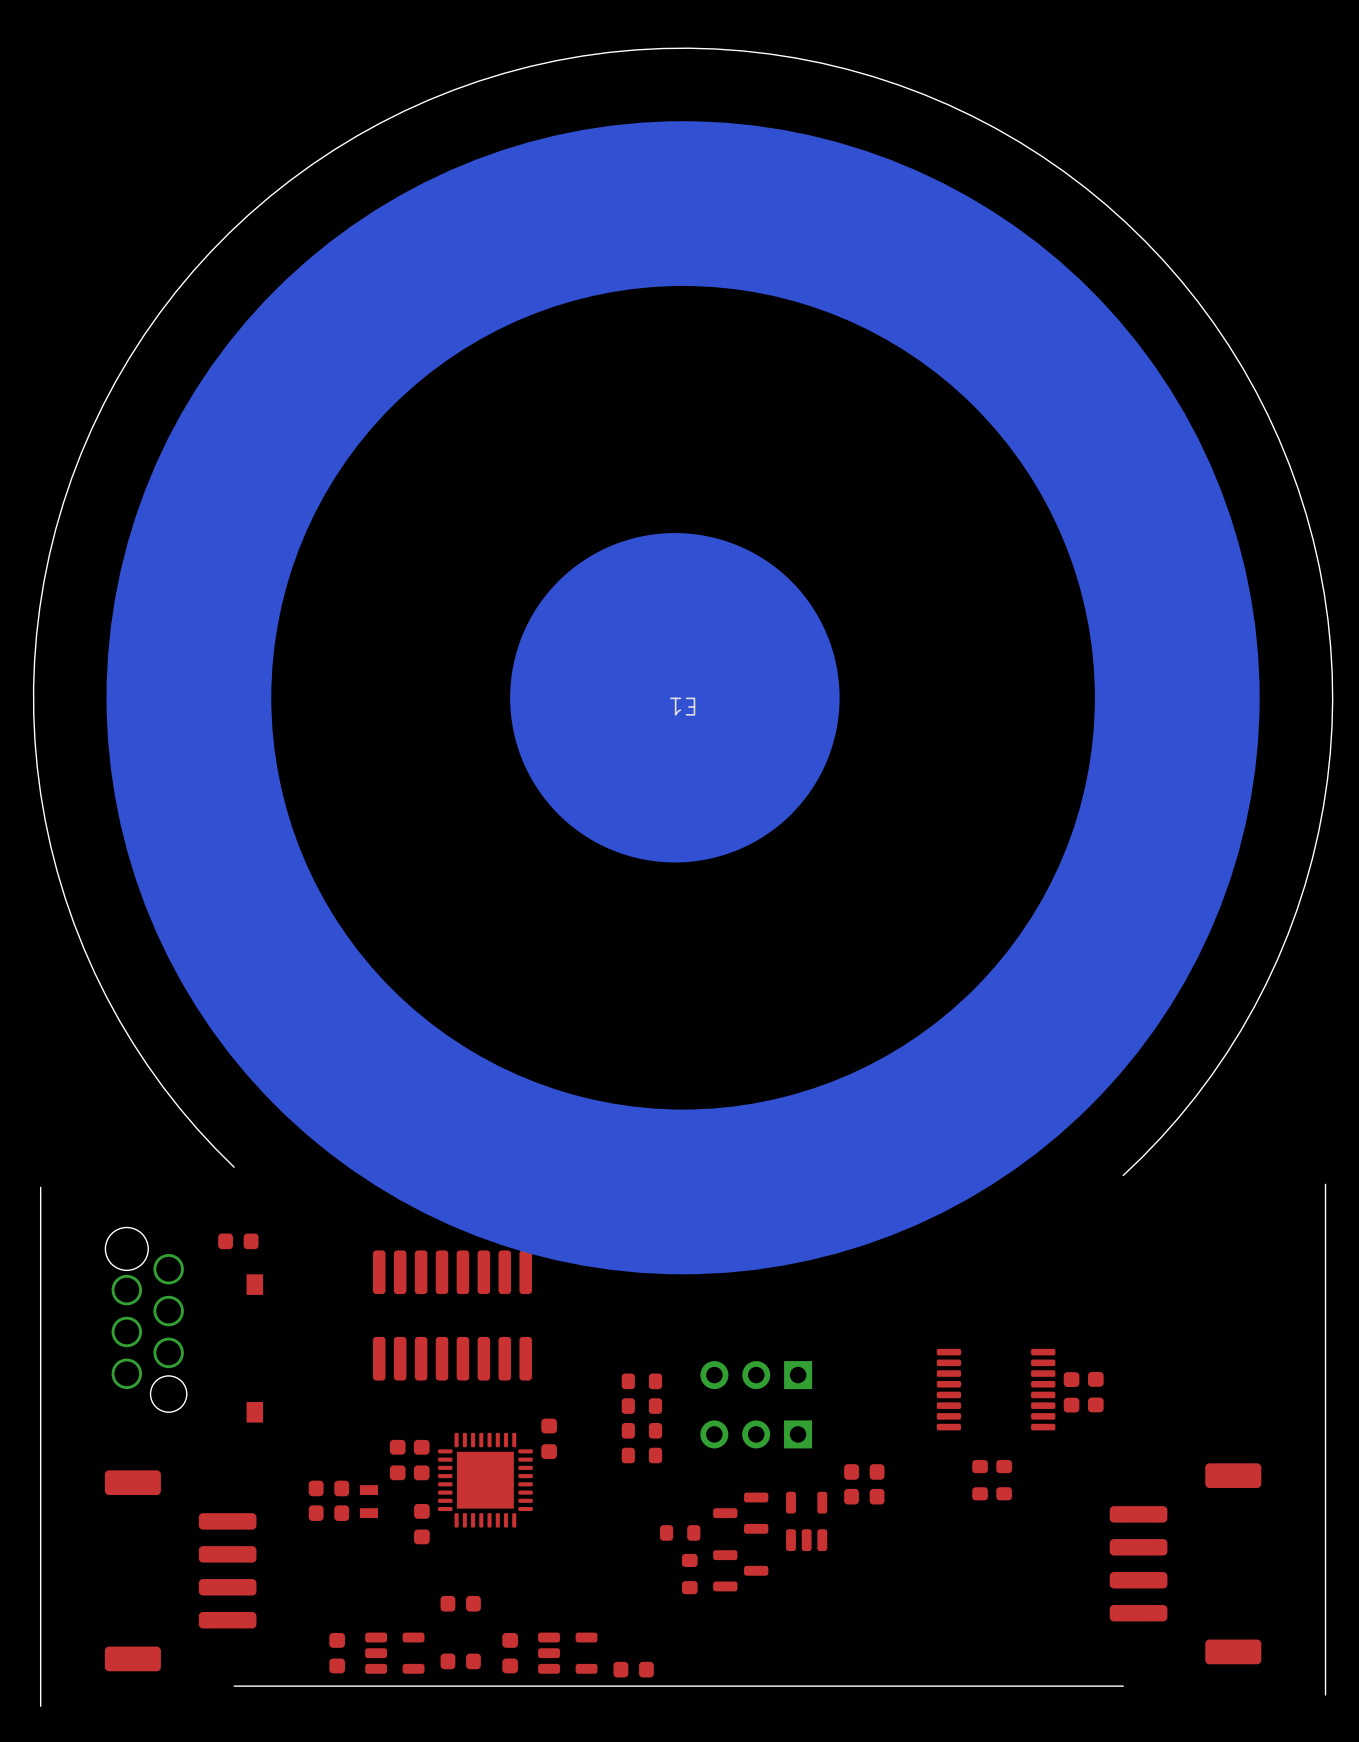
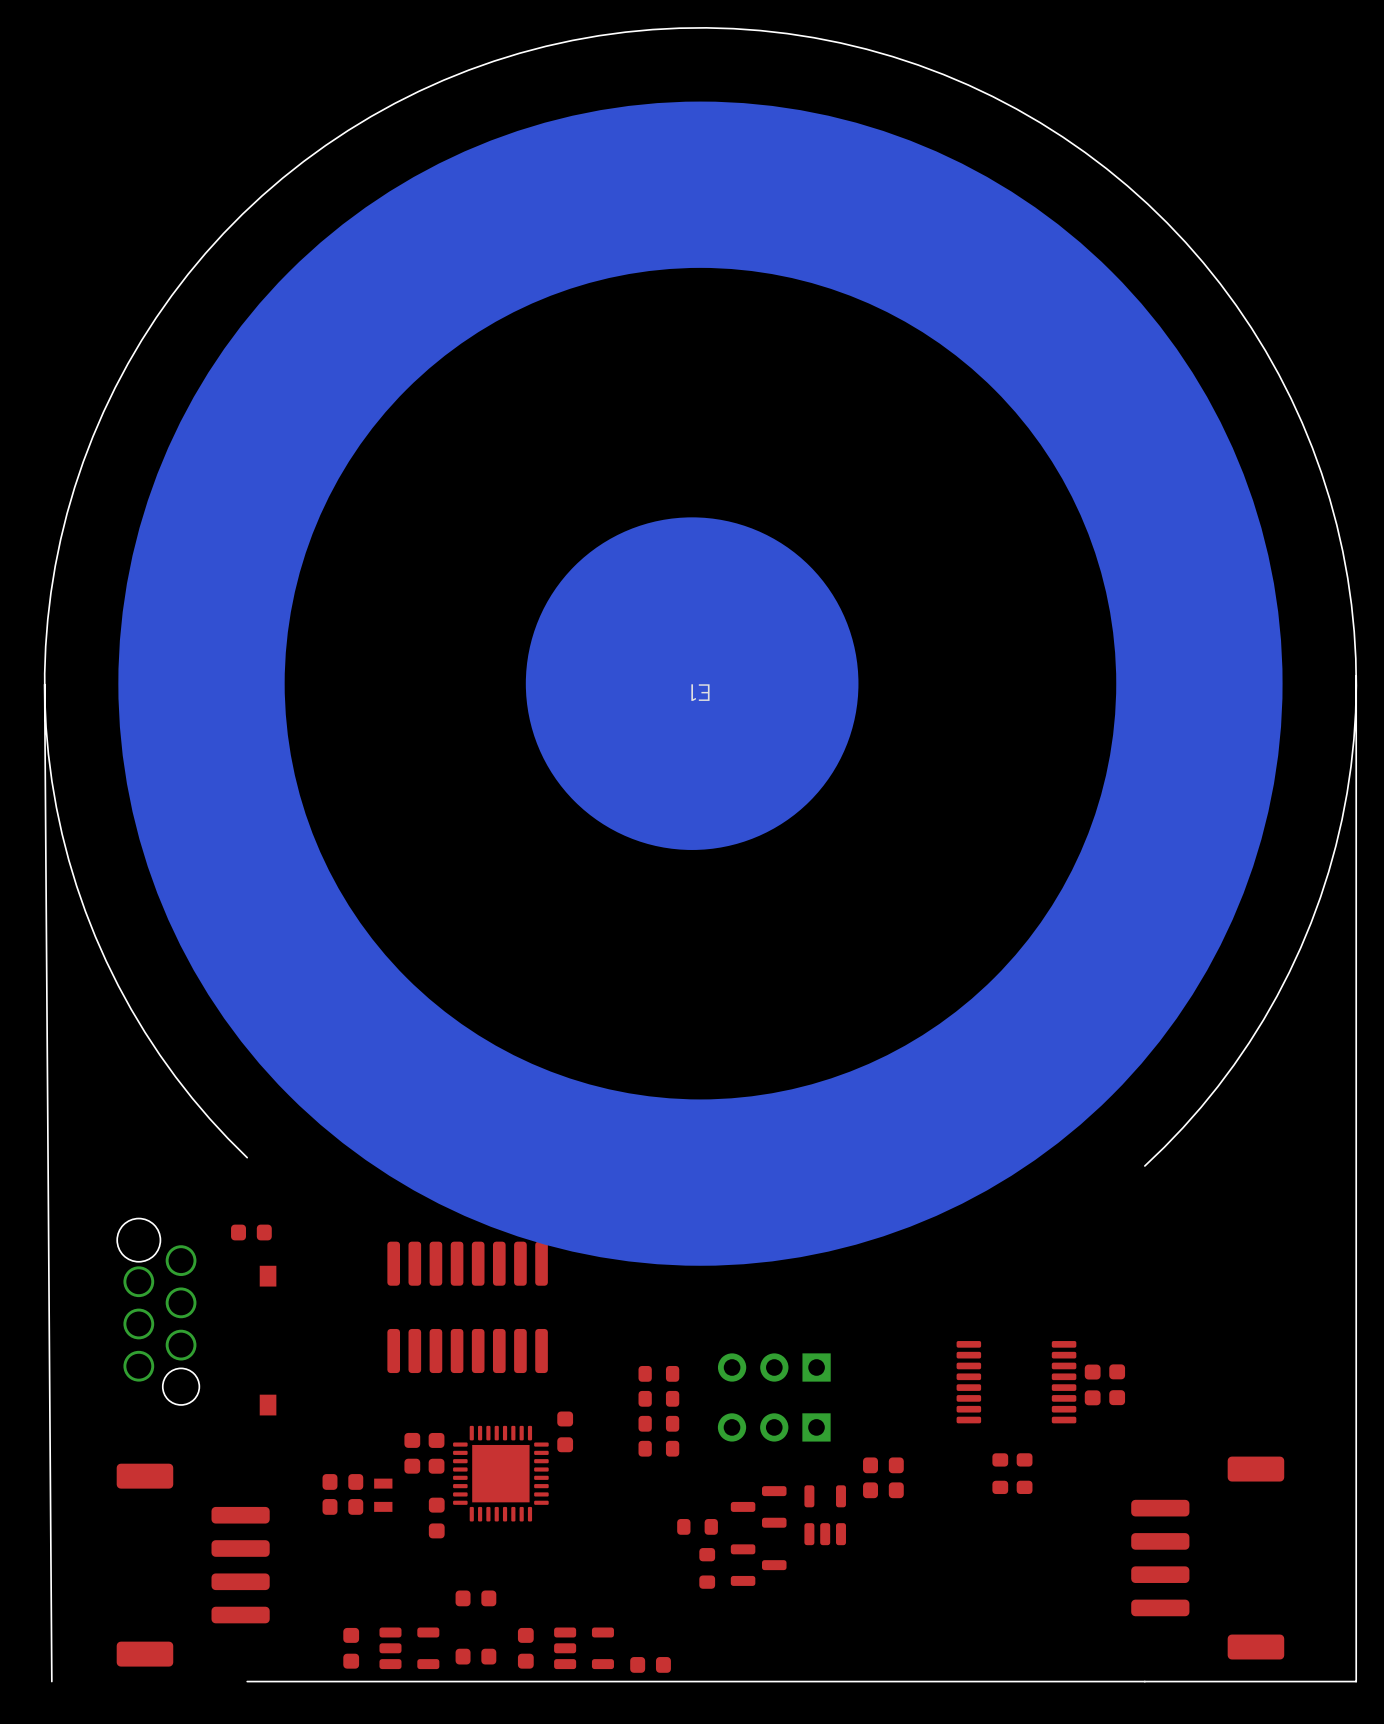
board edge: none -> (1356, 675) (1356, 1681) (1144, 1681)
board edge: none -> (44, 684) (51, 1681)
board edge: (1325, 1184) (1325, 1694) -> none
board edge: (40, 1187) (40, 1706) -> none

